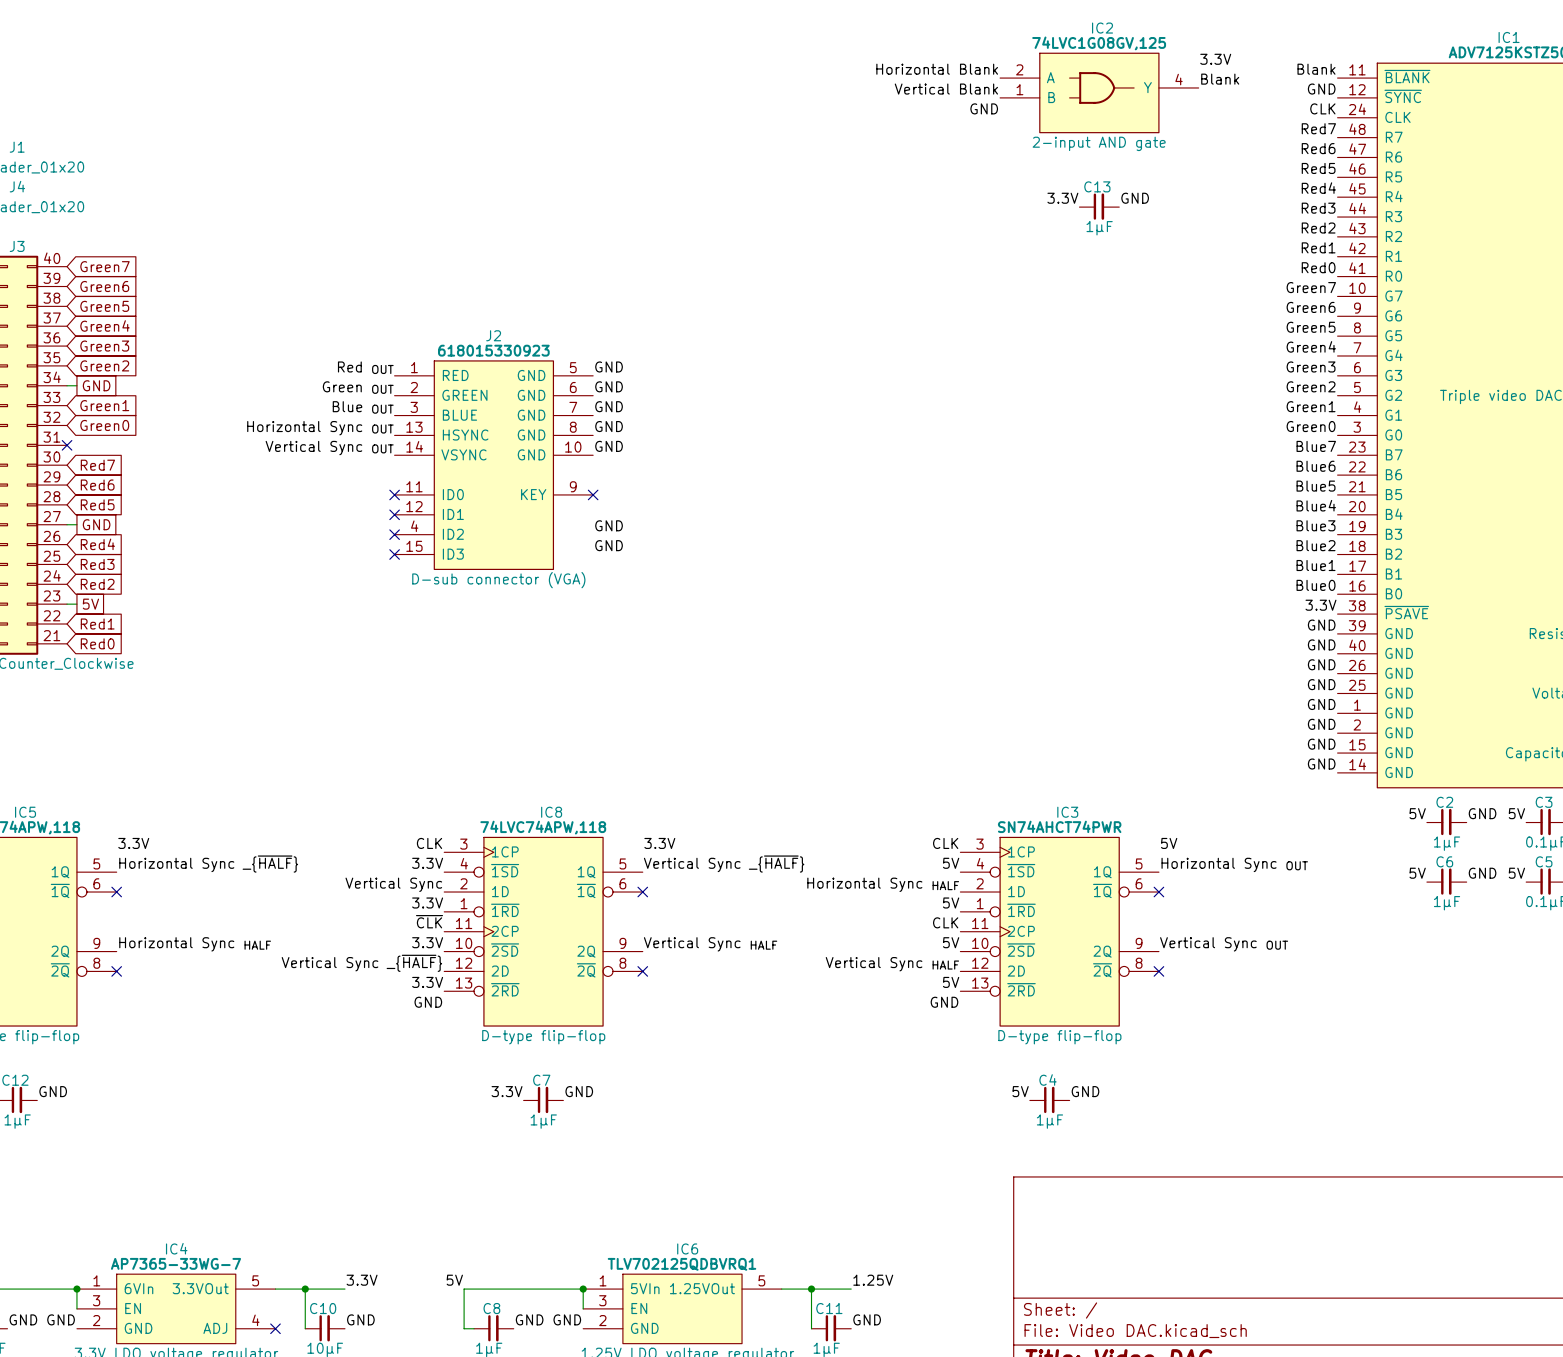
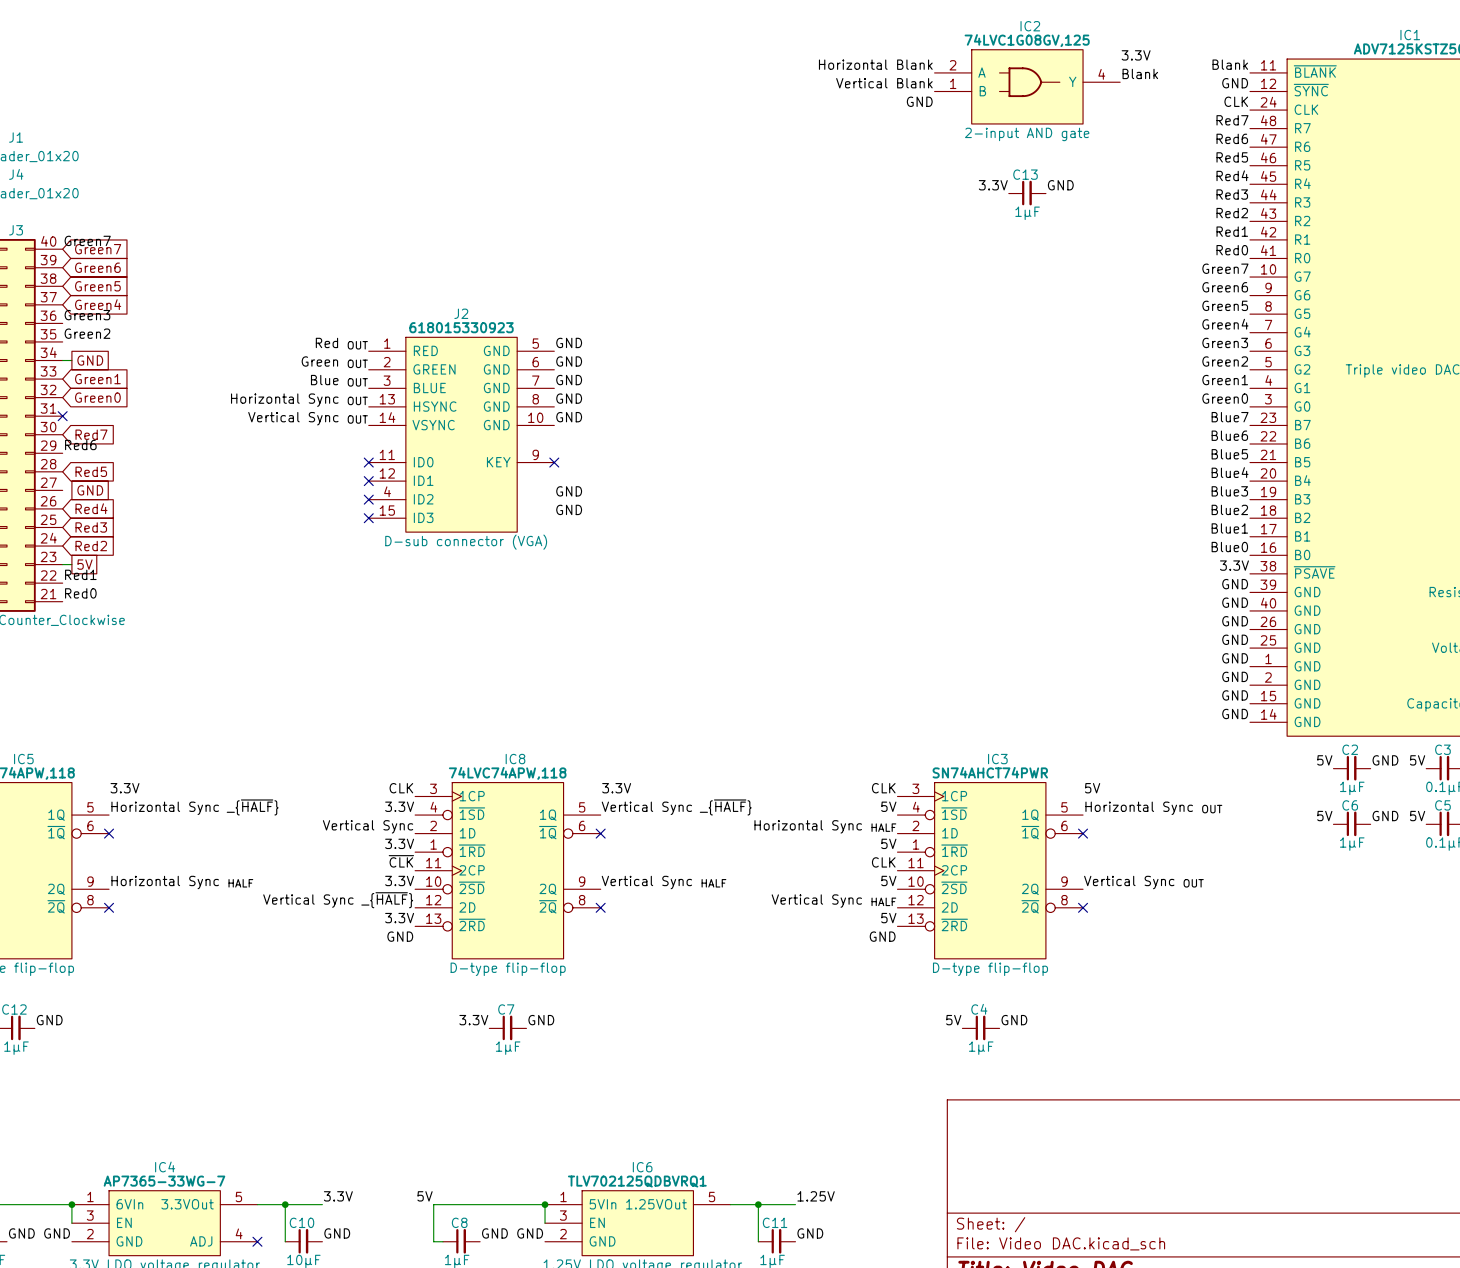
label: none -> Green7 (87, 240)
label: none -> Green3 (87, 315)
global label: Green3 (104, 346) -> none
label: none -> Green2 (87, 333)
global label: Green2 (104, 365) -> none
label: none -> Red6 (80, 444)
global label: Red6 (97, 485) -> none
wire: (67, 524) (76, 524) -> none
label: none -> Red1 (80, 574)
global label: Red1 (97, 624) -> none
label: none -> Red0 (80, 593)
global label: Red0 (97, 643) -> none

